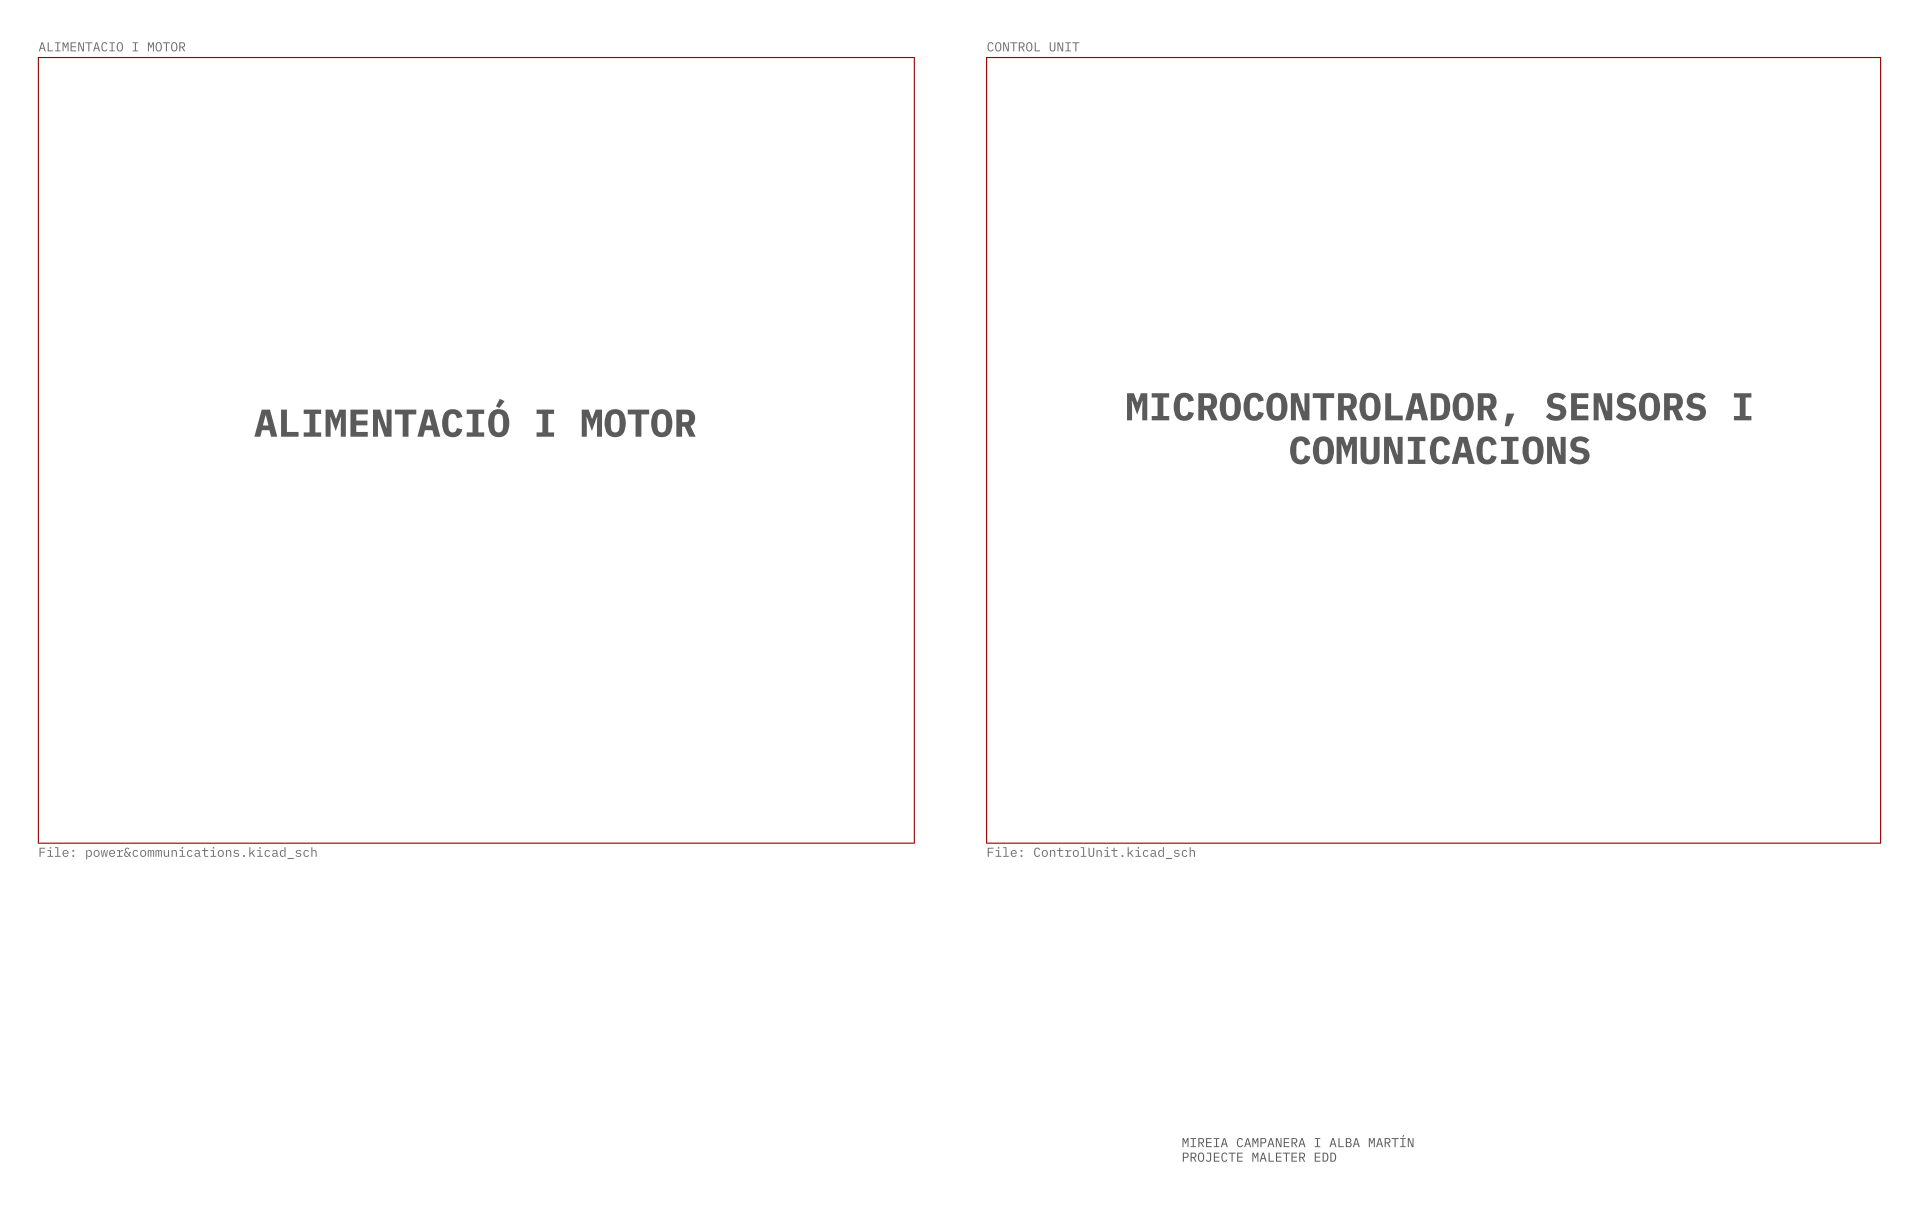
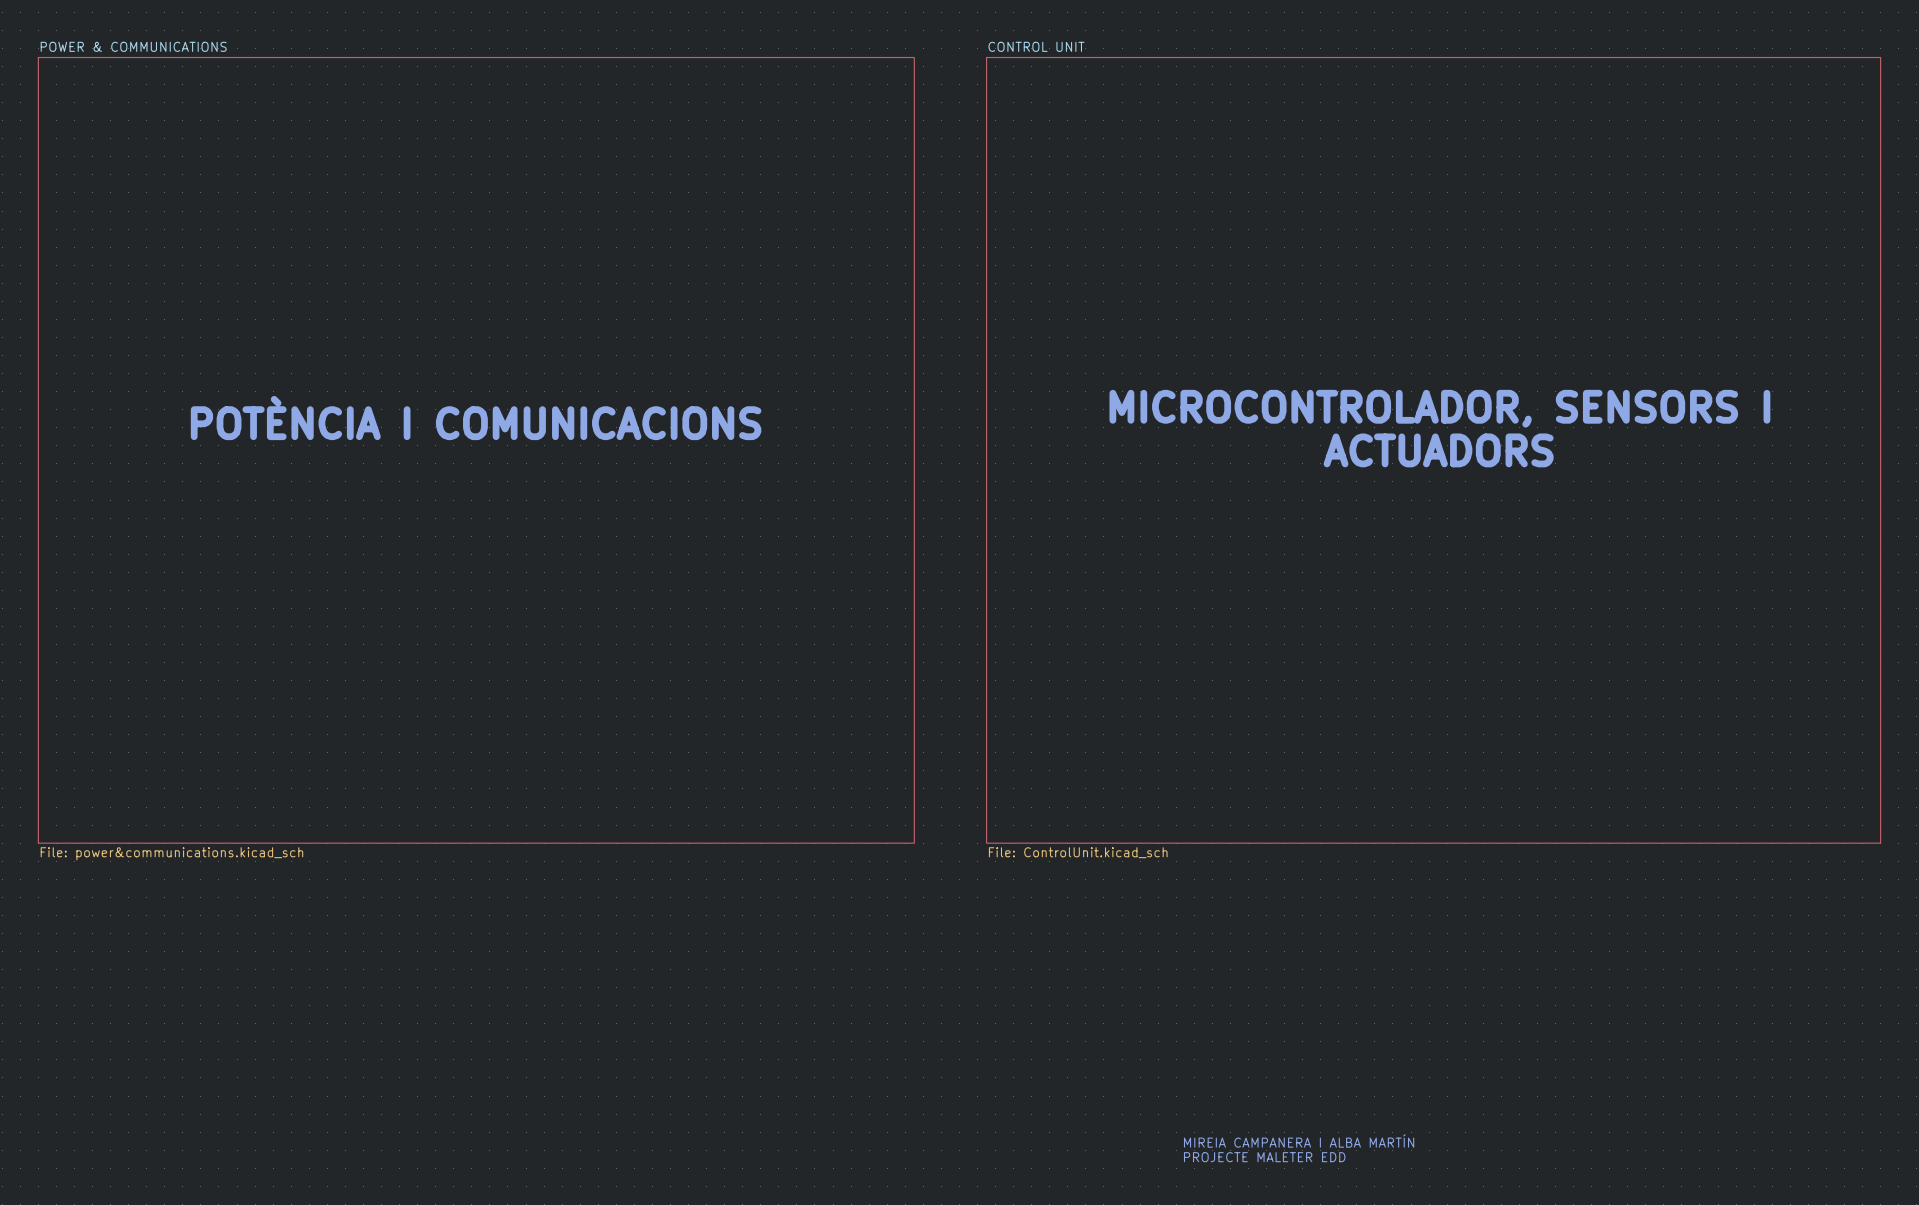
sheet ALIMENTACIO I MOTOR name: ALIMENTACIO I MOTOR (111, 46) -> POWER & COMMUNICATIONS (133, 46)
text: ALIMENTACIÓ I MOTOR (475, 417) -> POTÈNCIA I COMUNICACIONS (476, 418)
text: COMUNICACIONS (1439, 450) -> ACTUADORS (1438, 450)

